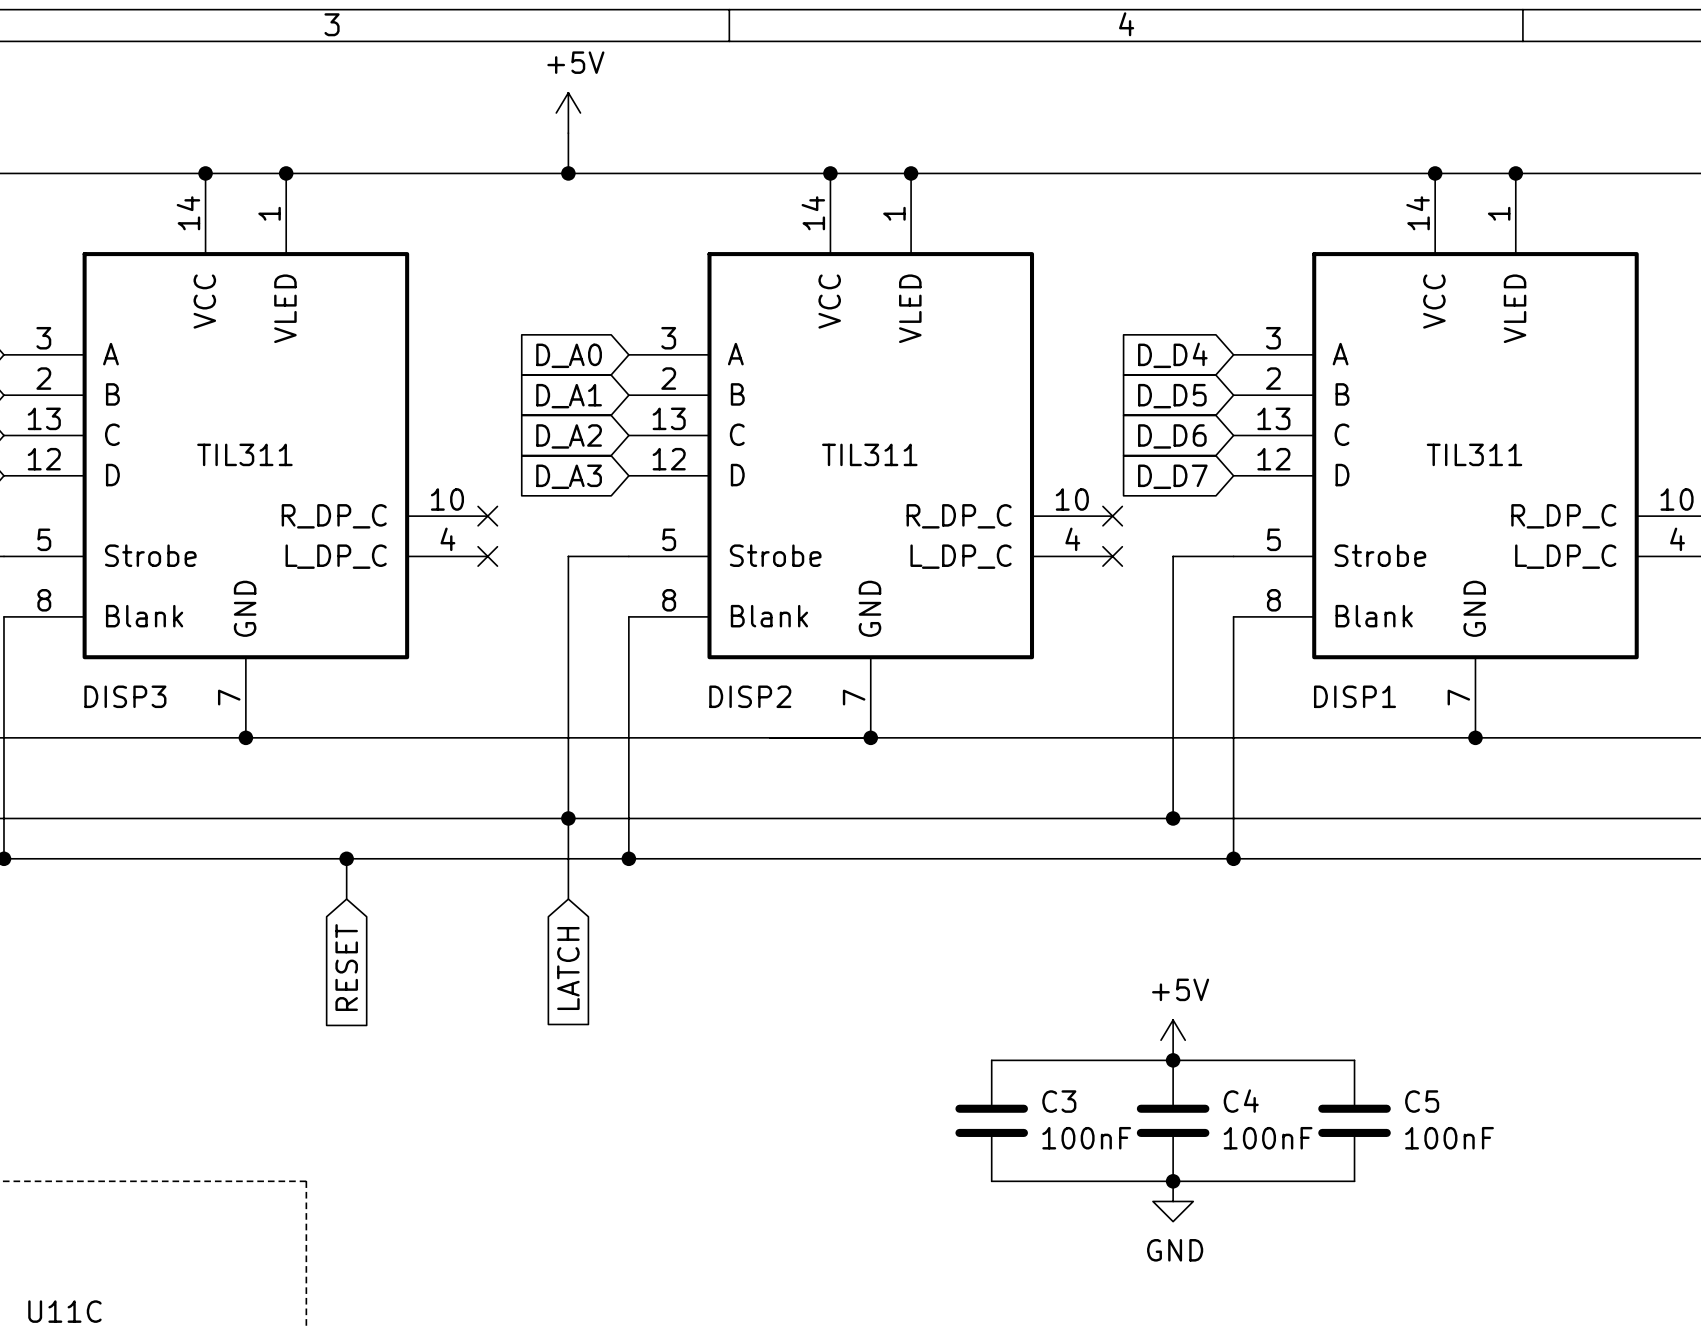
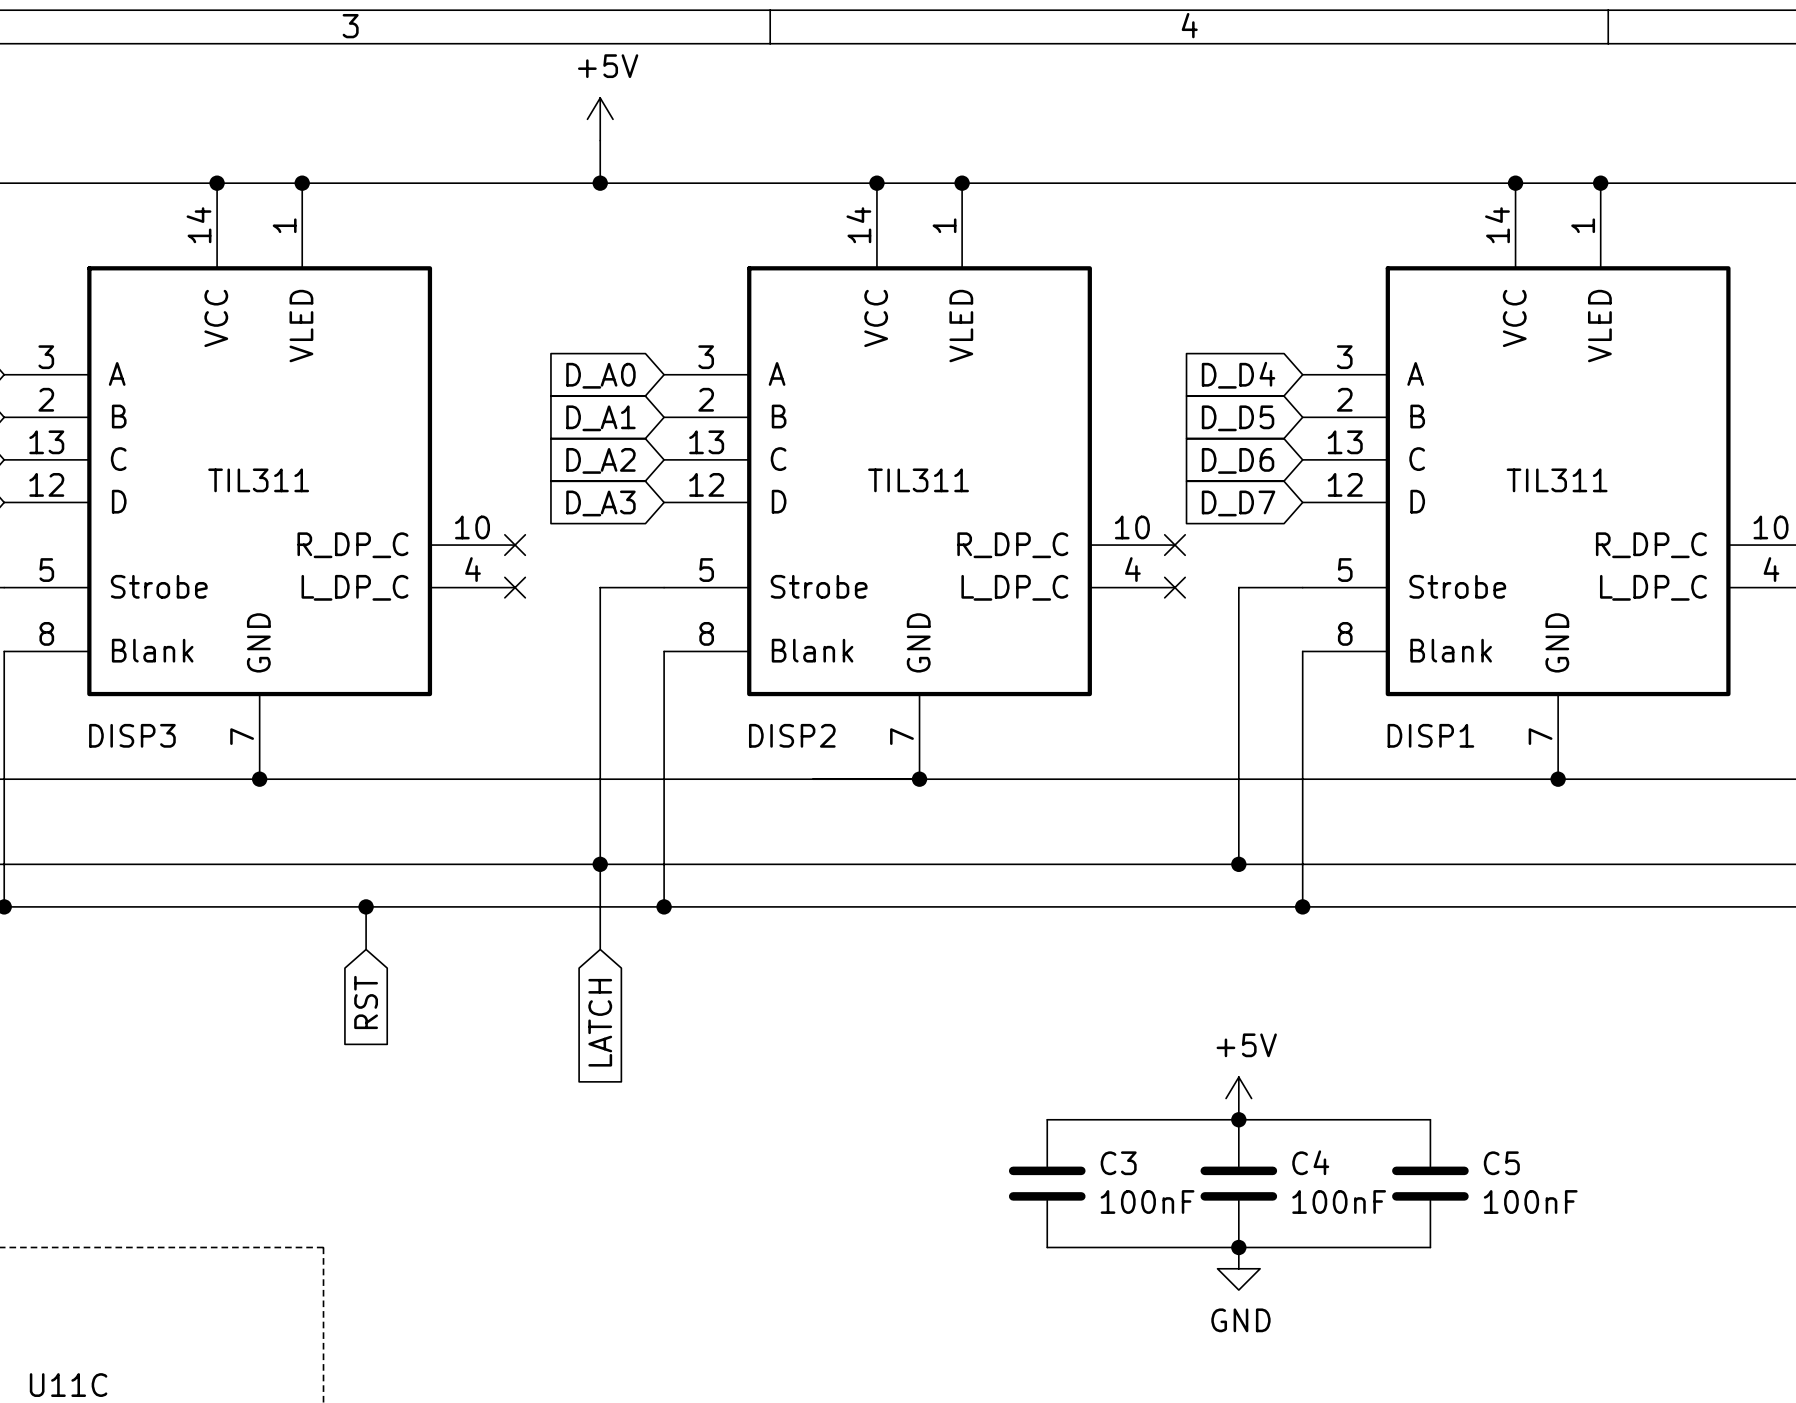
global label: RESET (346, 967) -> RST (366, 1002)

